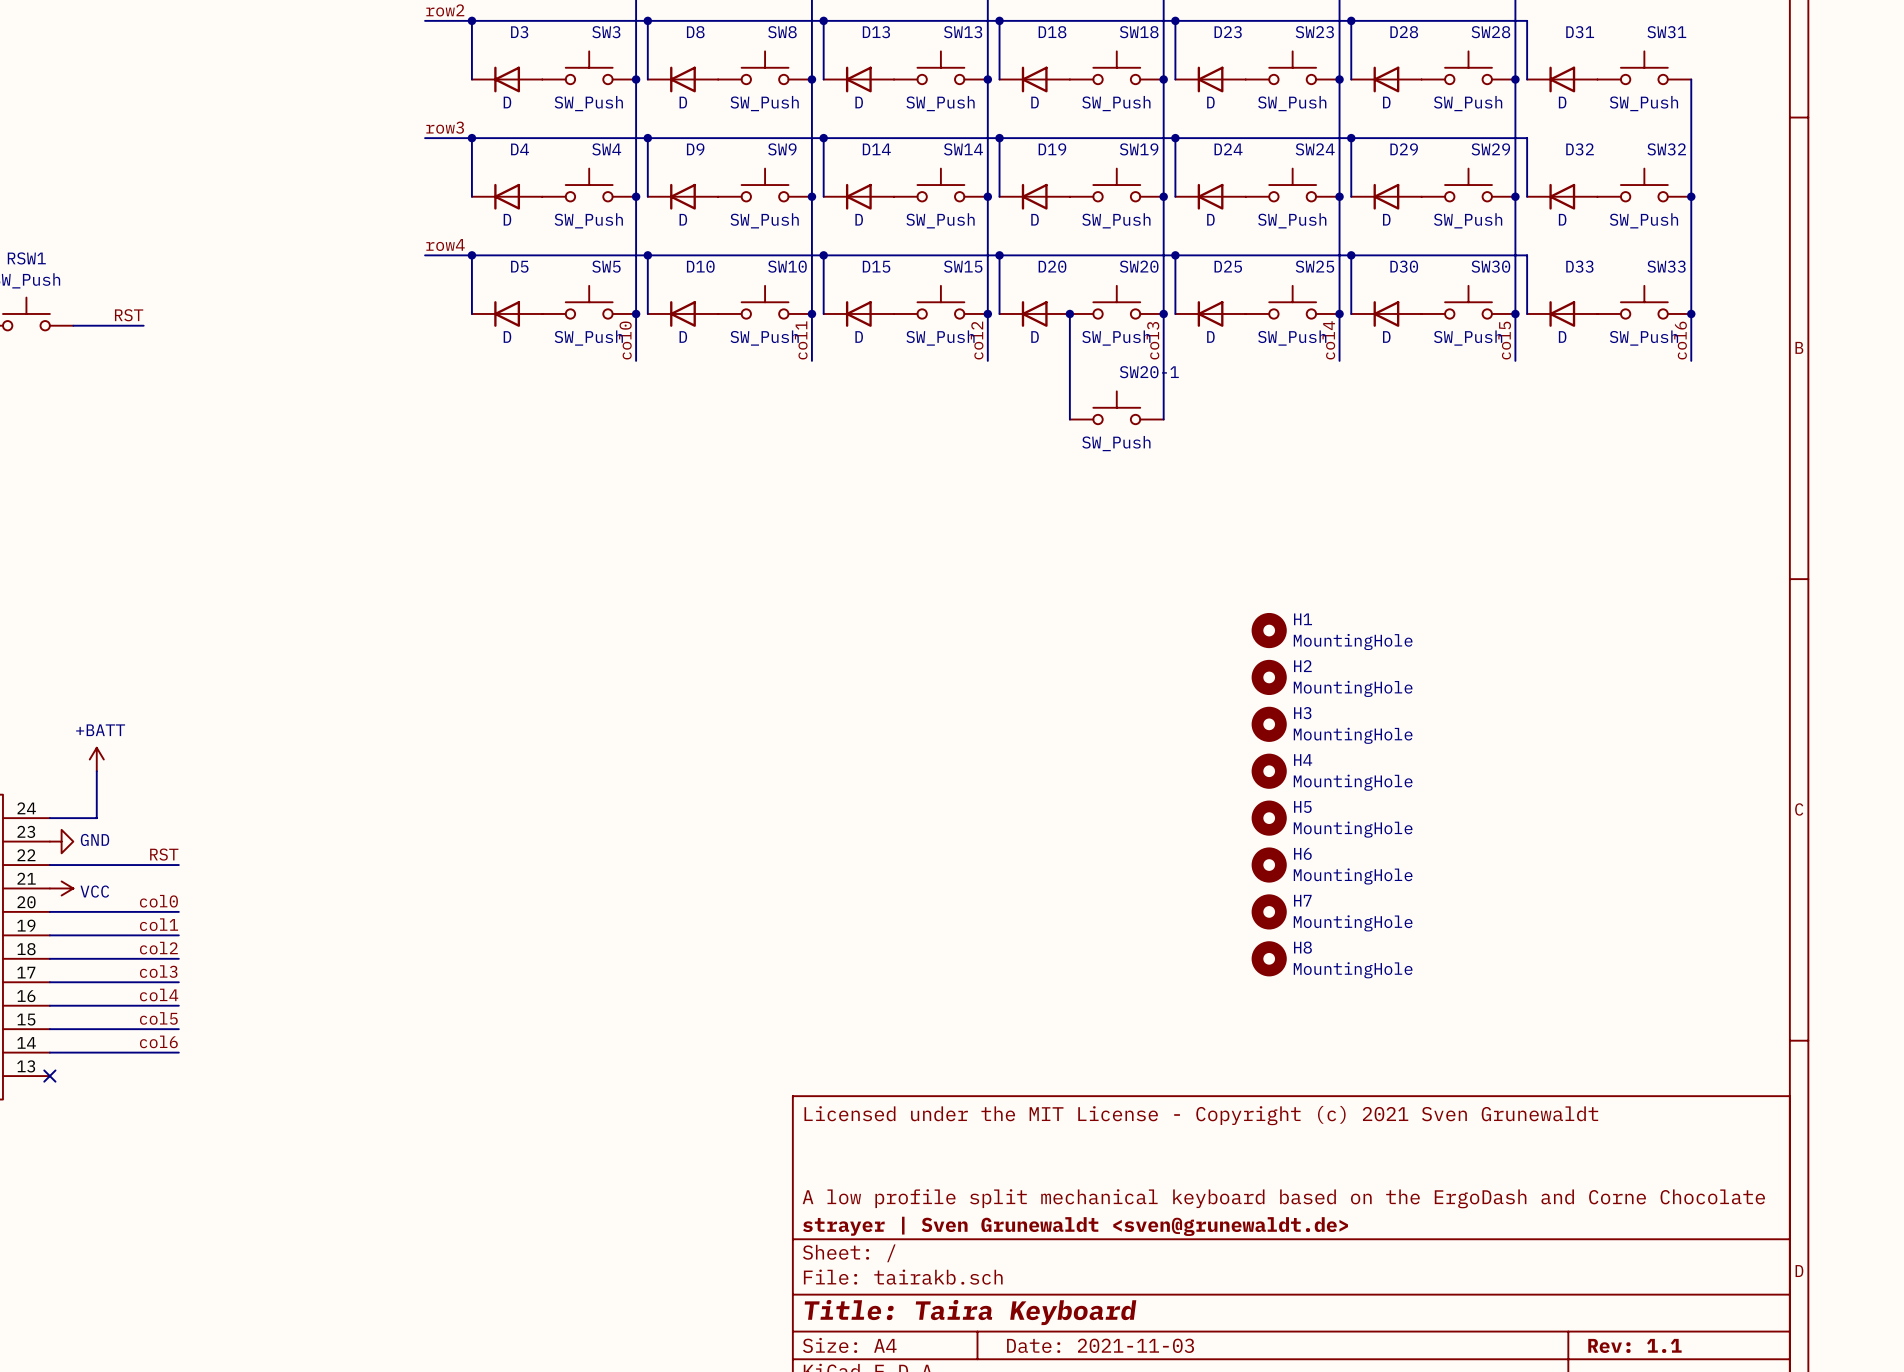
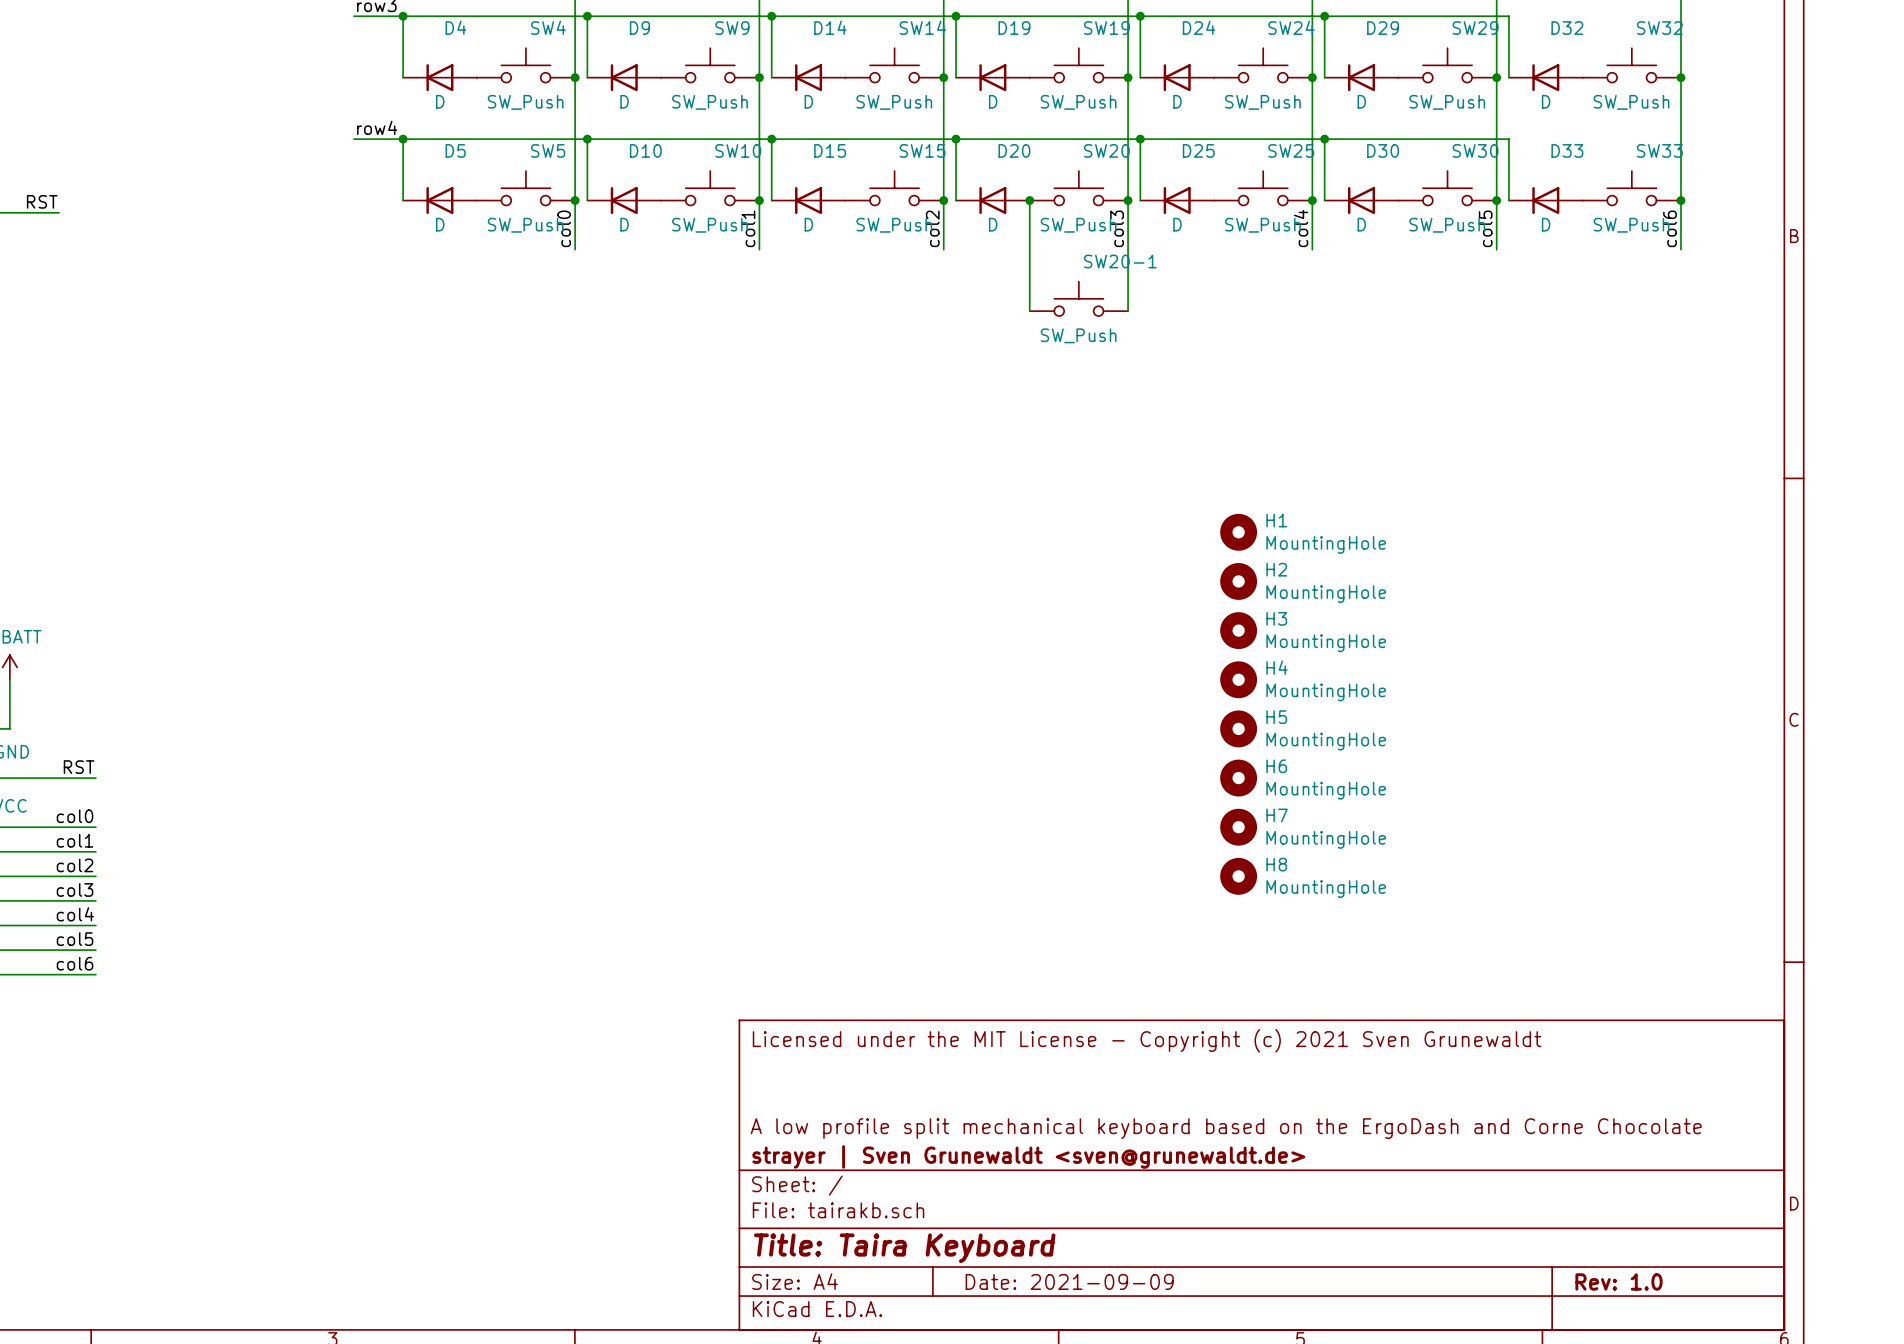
title block: Date: 2021-11-03 (1100, 1345) -> Date: 2021-09-09 (1069, 1281)
title block: Rev: 1.1 (1634, 1345) -> Rev: 1.0 (1619, 1281)

